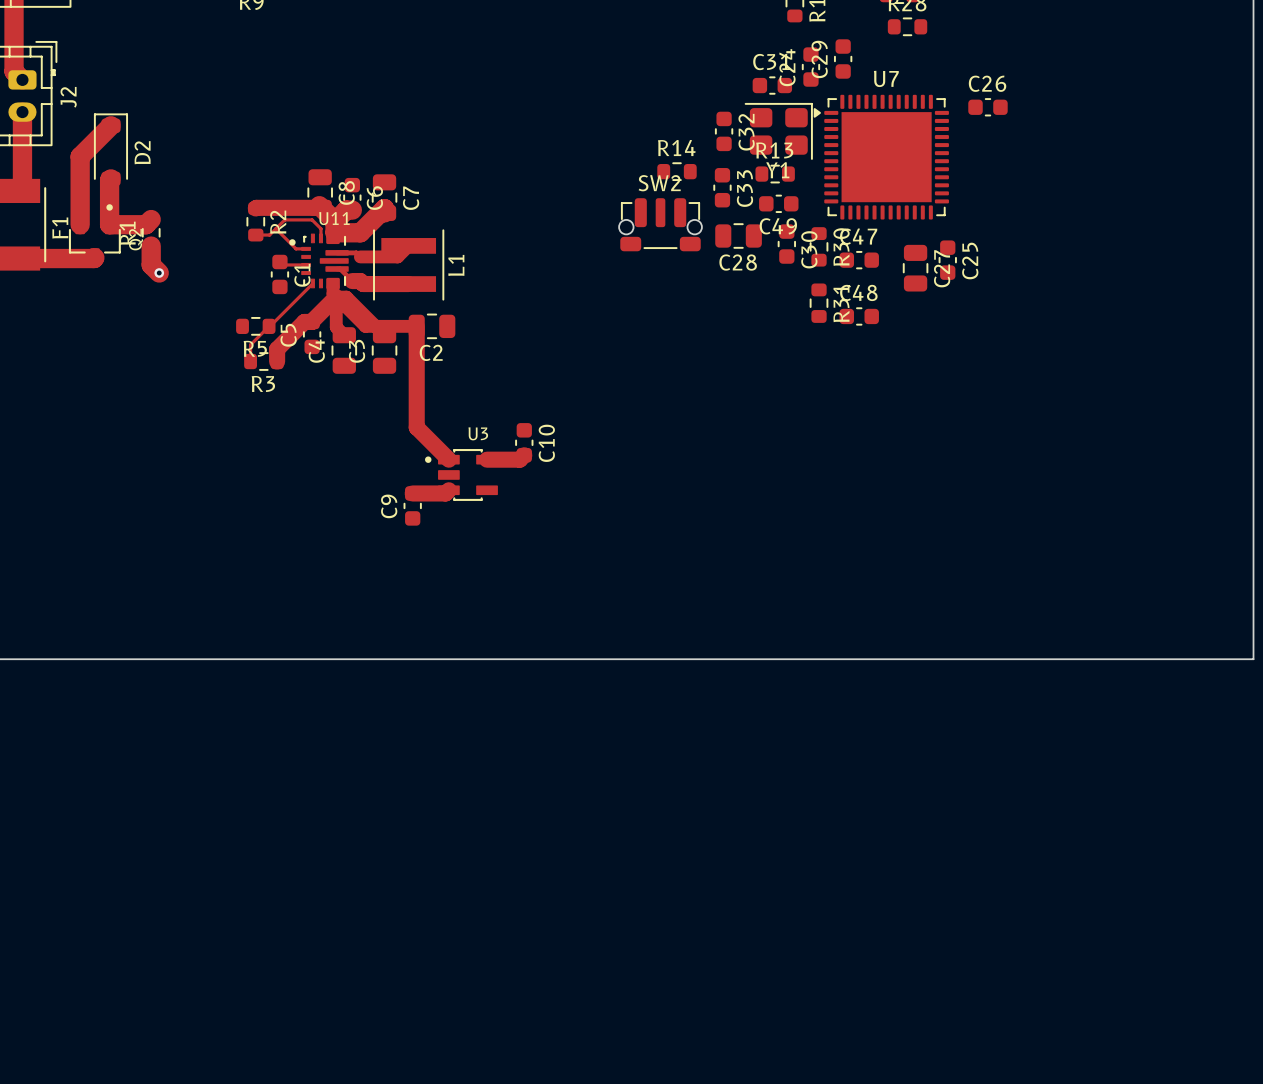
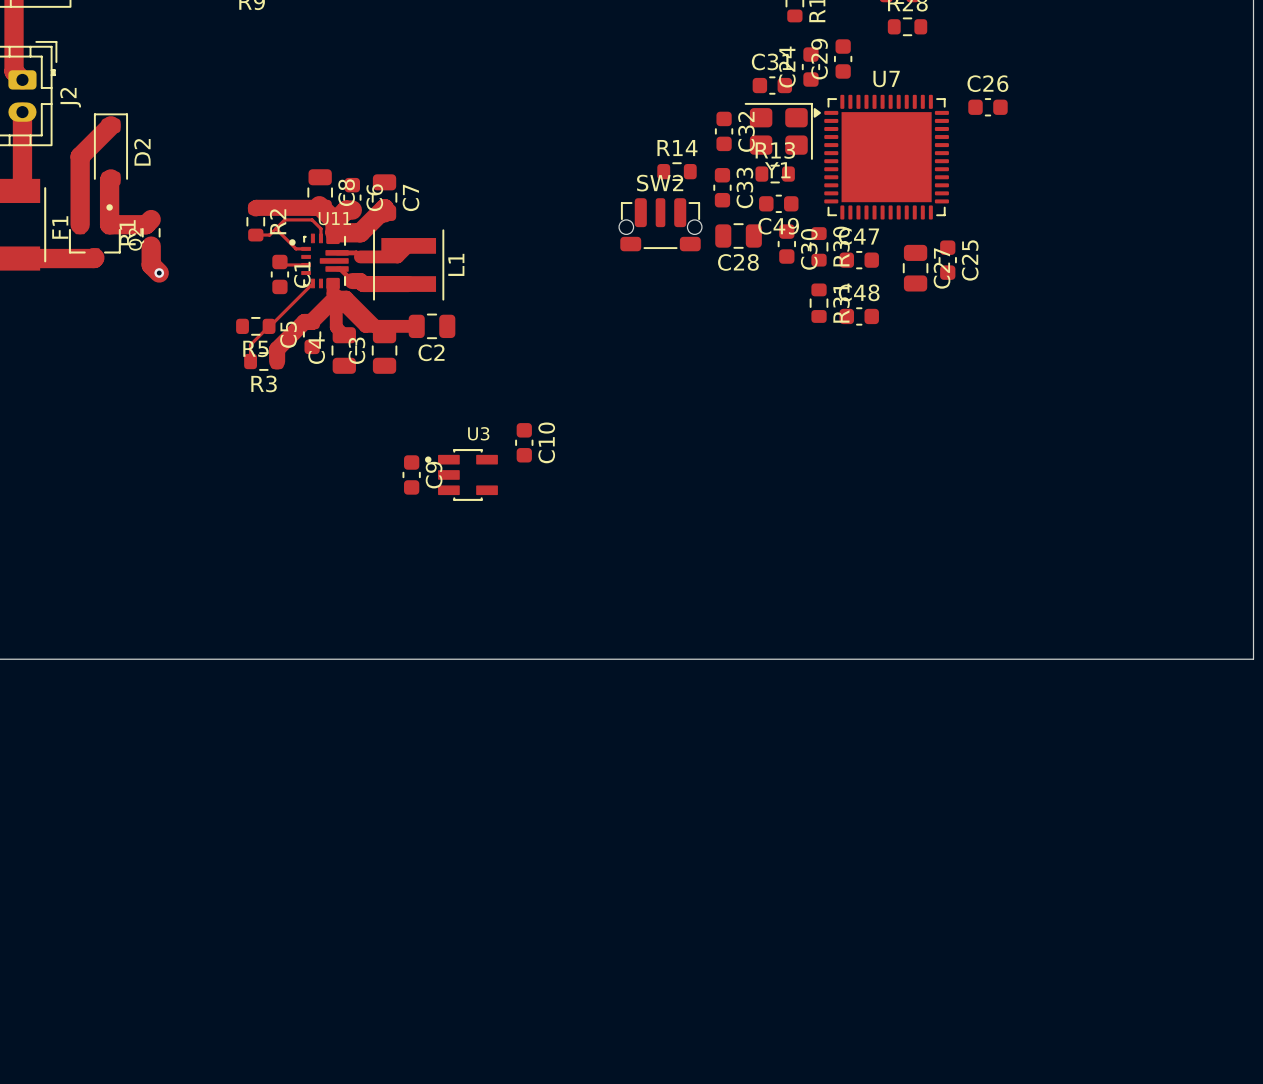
top track: (416, 326) (416, 427) (448, 459) -> none
top track: (524, 455) (519, 459) (487, 459) -> none
top track: (448, 490) (445, 493) (412, 493) -> none
C9 position: (412, 505) -> (411, 474)
C9 name position: C9 (389, 506) -> C9 (434, 475)

